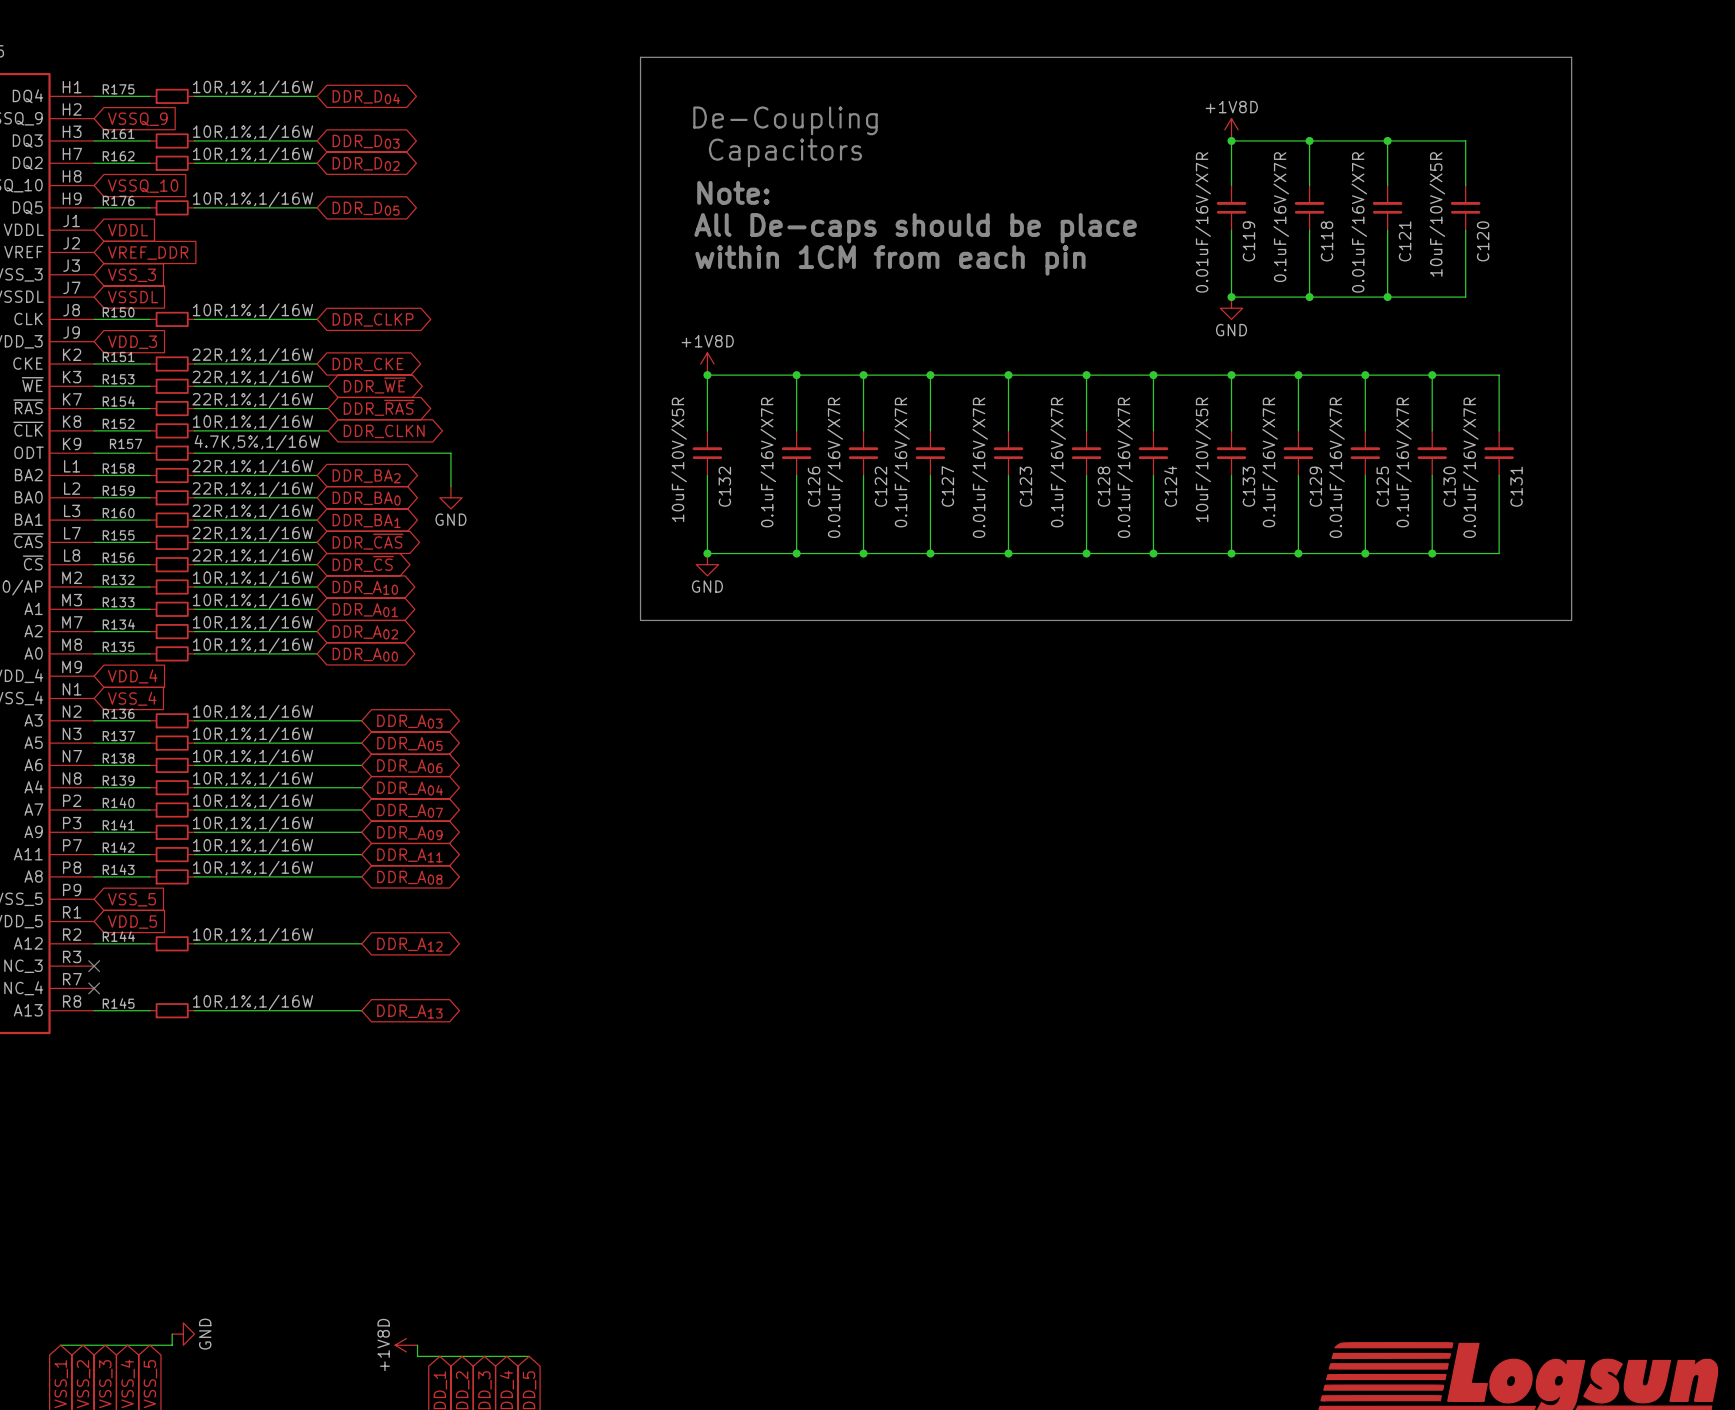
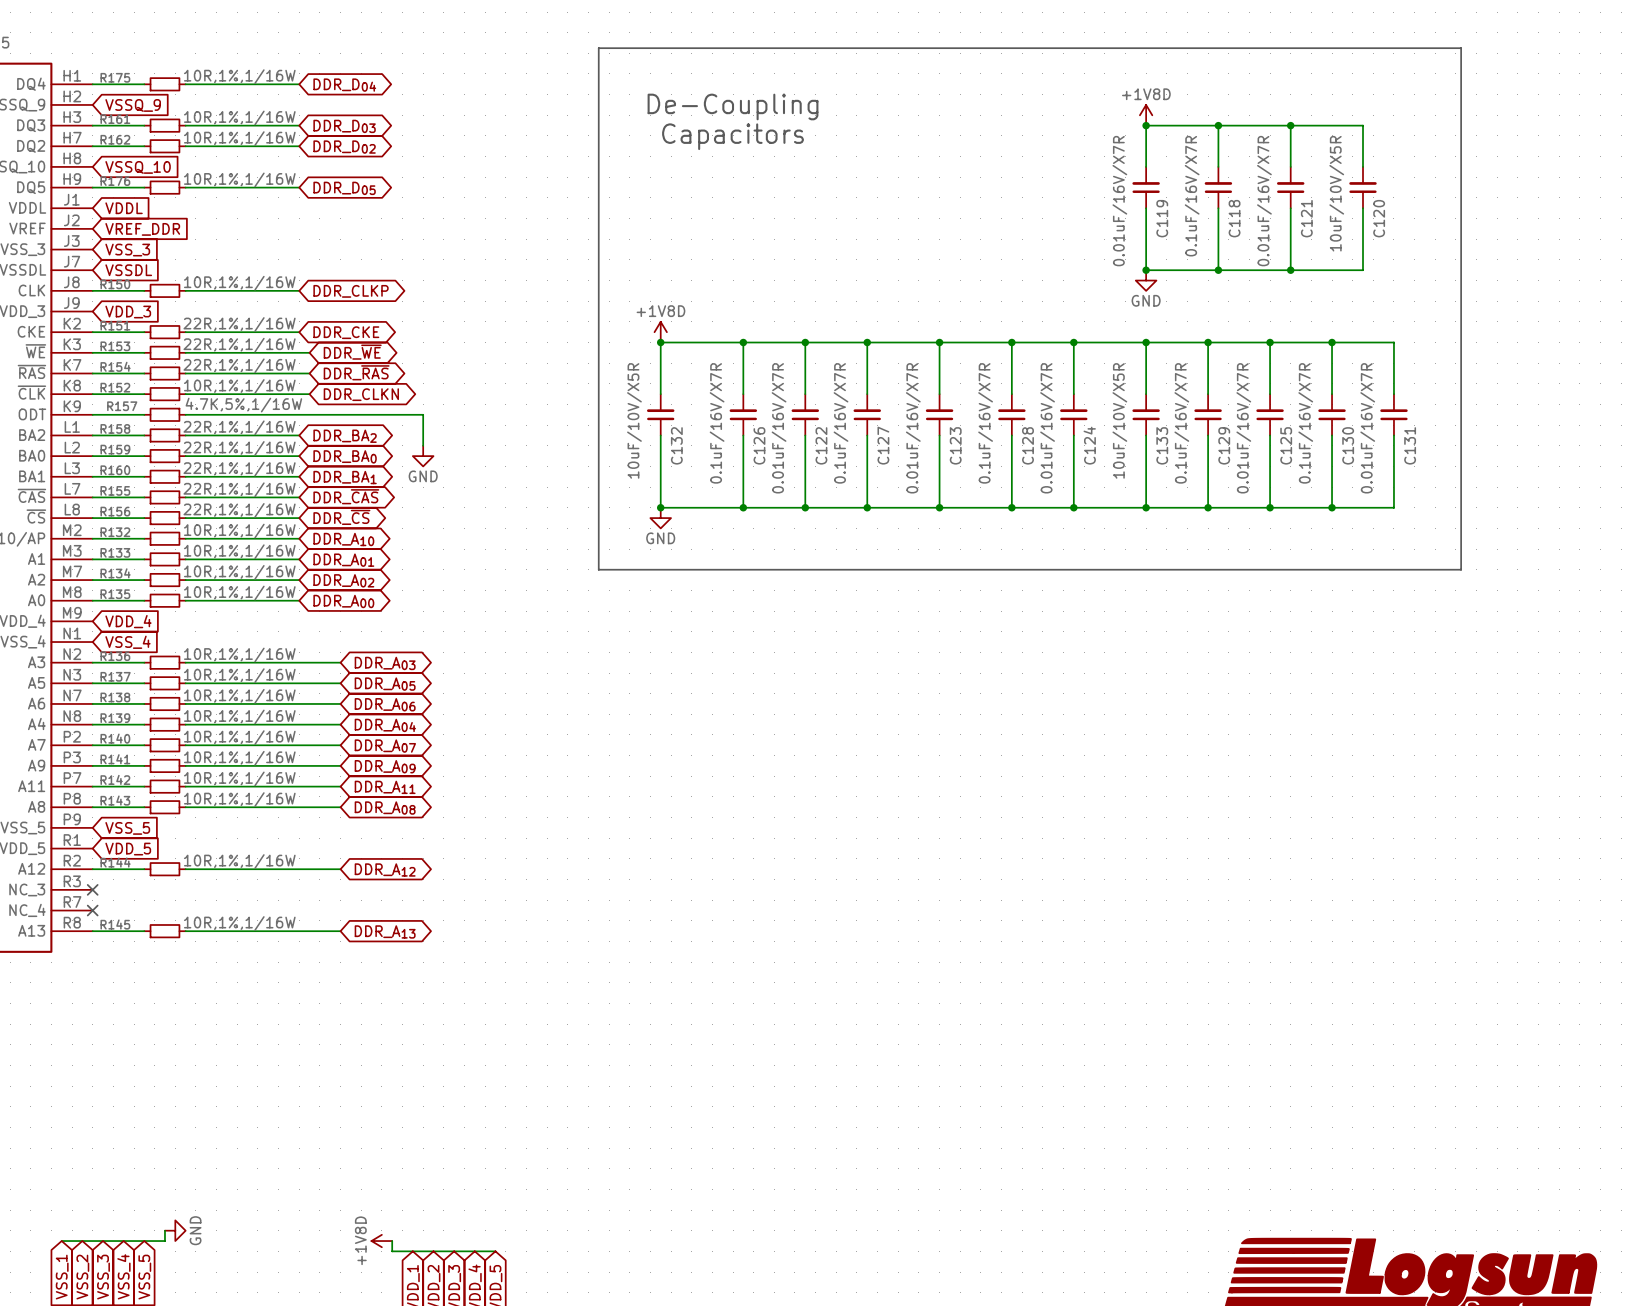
text: Note: (733, 192) -> none
text: All De-caps should be place (915, 228) -> none
text: within 1CM from each pin (890, 260) -> none

